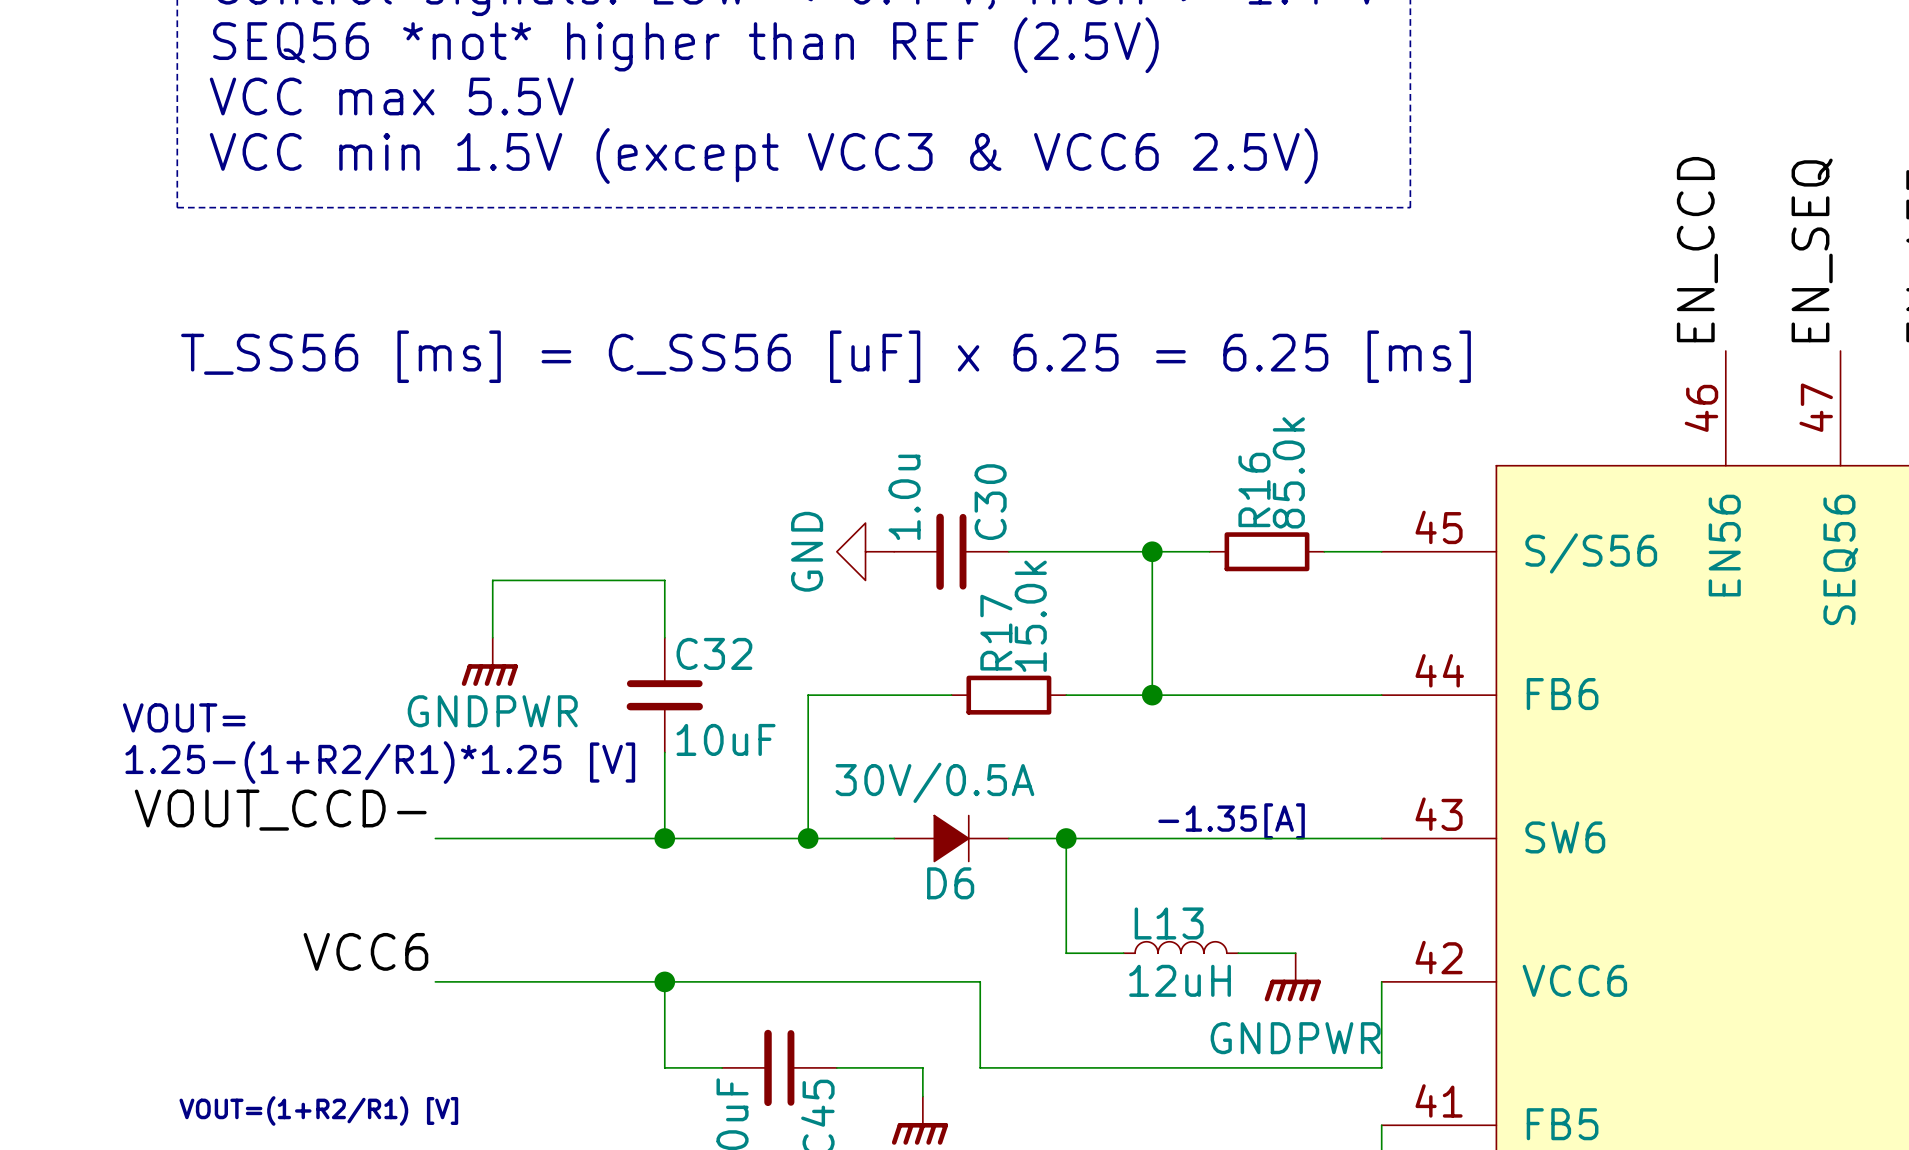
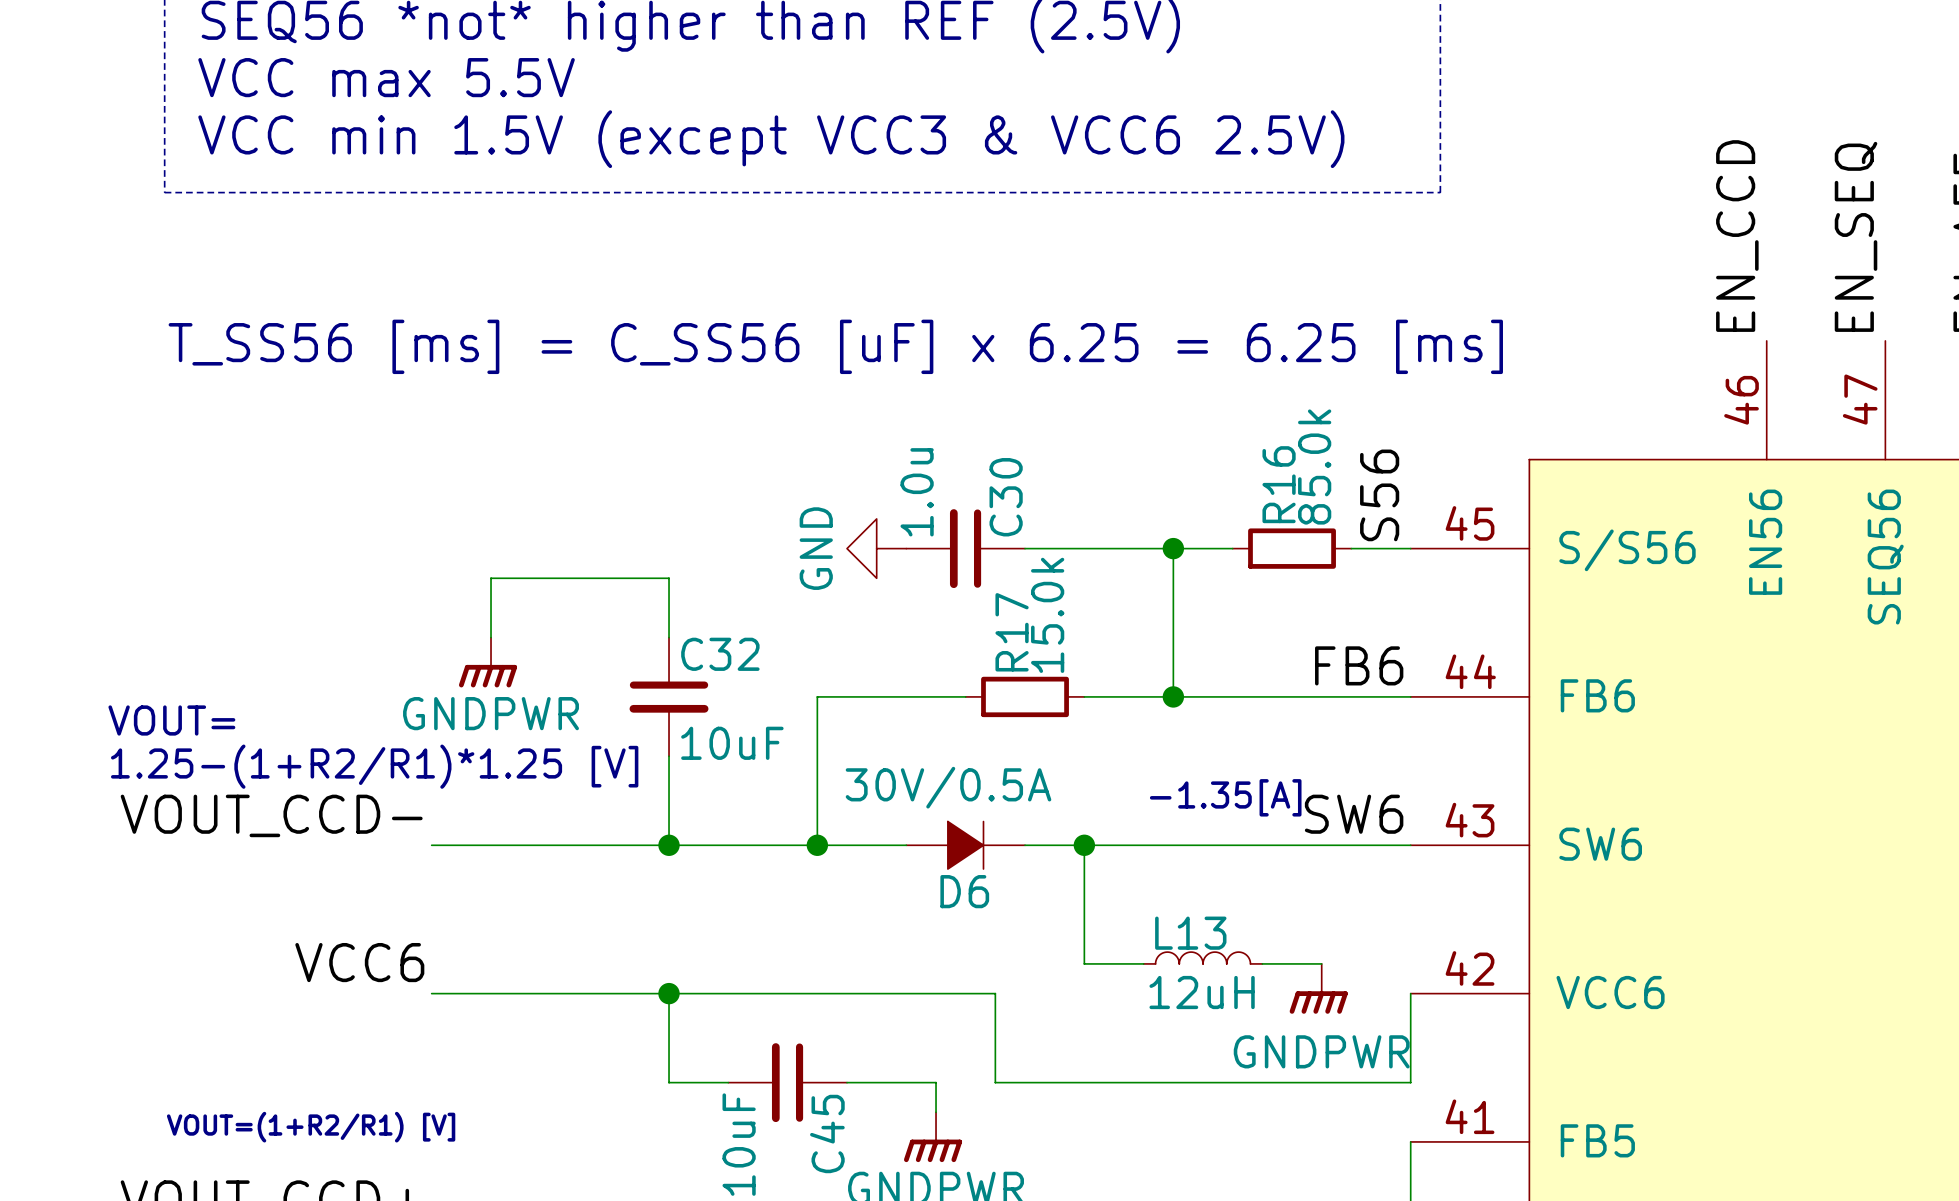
label: none -> S56 (1379, 495)
label: none -> FB6 (1359, 665)
label: none -> SW6 (1354, 814)
text position: -1.35[A] (1231, 821) -> -1.35[A] (1225, 797)

